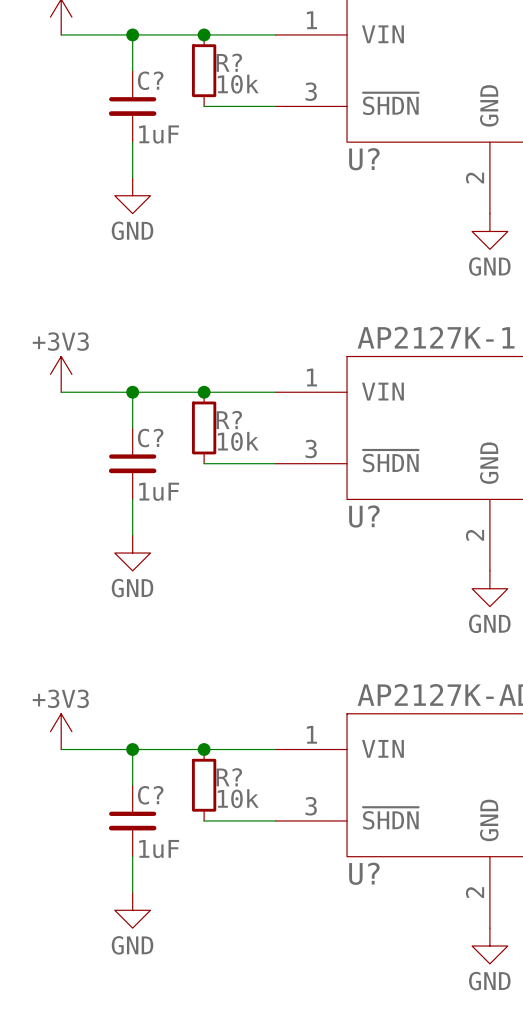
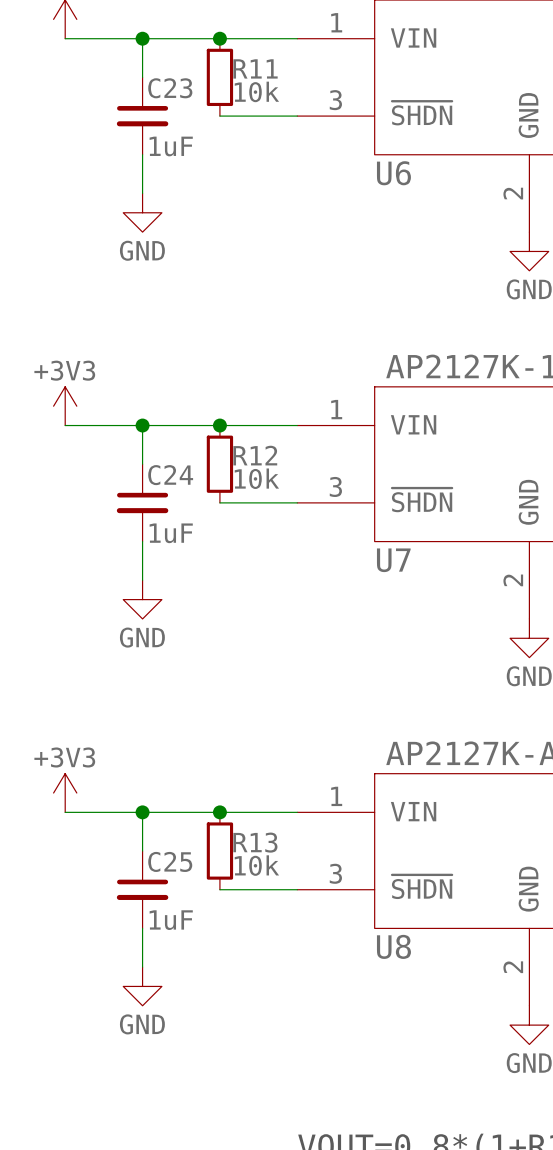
R? name: R? (229, 62) -> R11 (255, 68)
C? name: C? (150, 80) -> C23 (170, 88)
U? name: U? (364, 159) -> U6 (393, 173)
R? name: R? (229, 419) -> R12 (255, 455)
C? name: C? (150, 438) -> C24 (170, 475)
U? name: U? (364, 516) -> U7 (393, 560)
R? name: R? (229, 777) -> R13 (255, 842)
C? name: C? (150, 795) -> C25 (170, 861)
U? name: U? (364, 873) -> U8 (393, 946)

